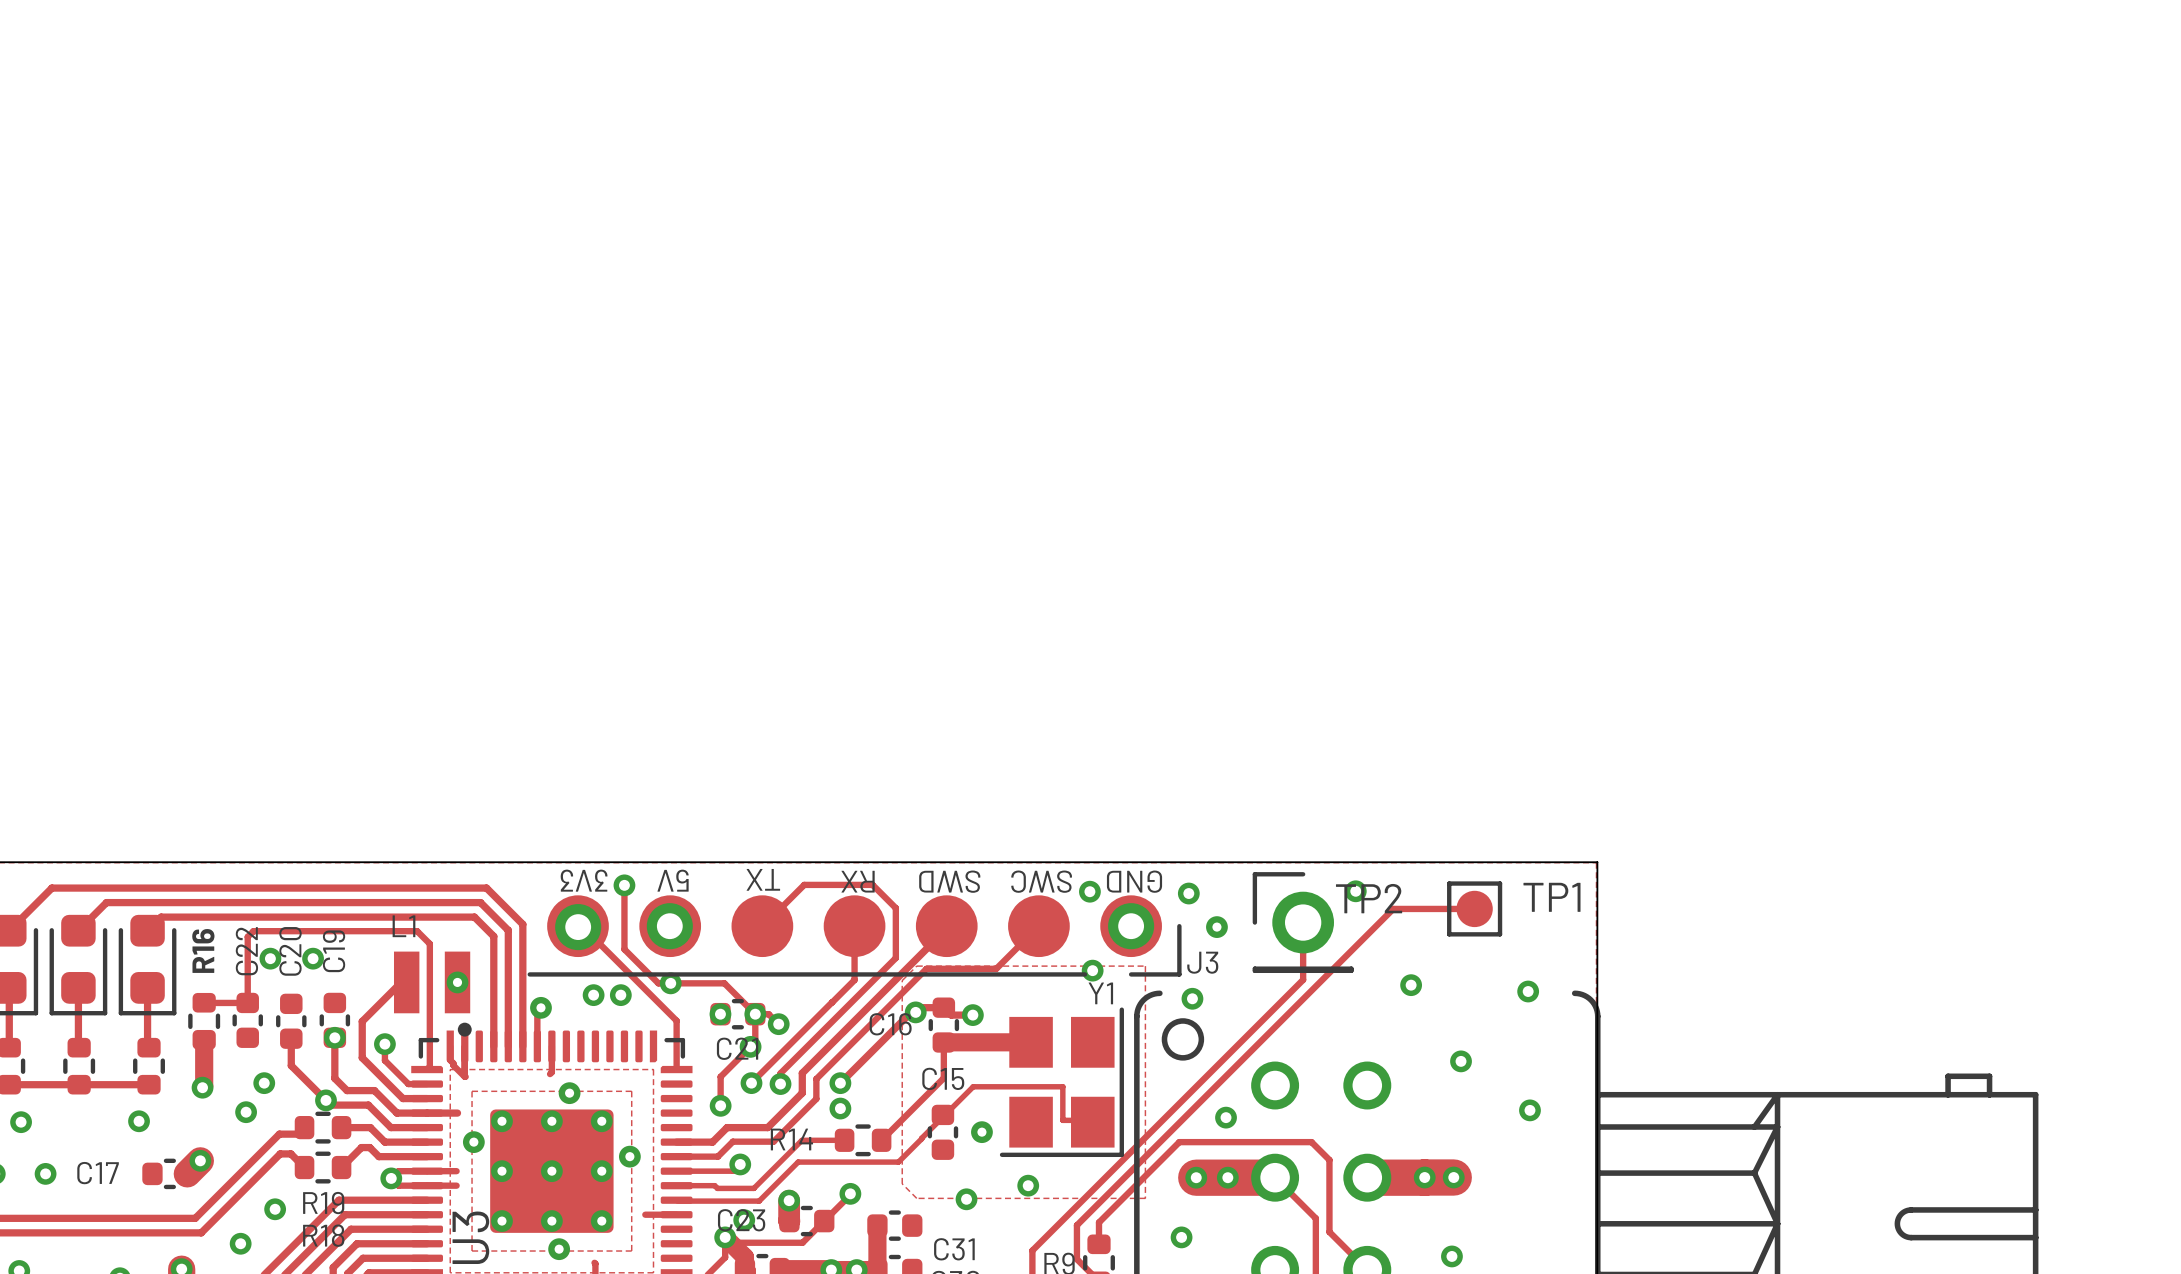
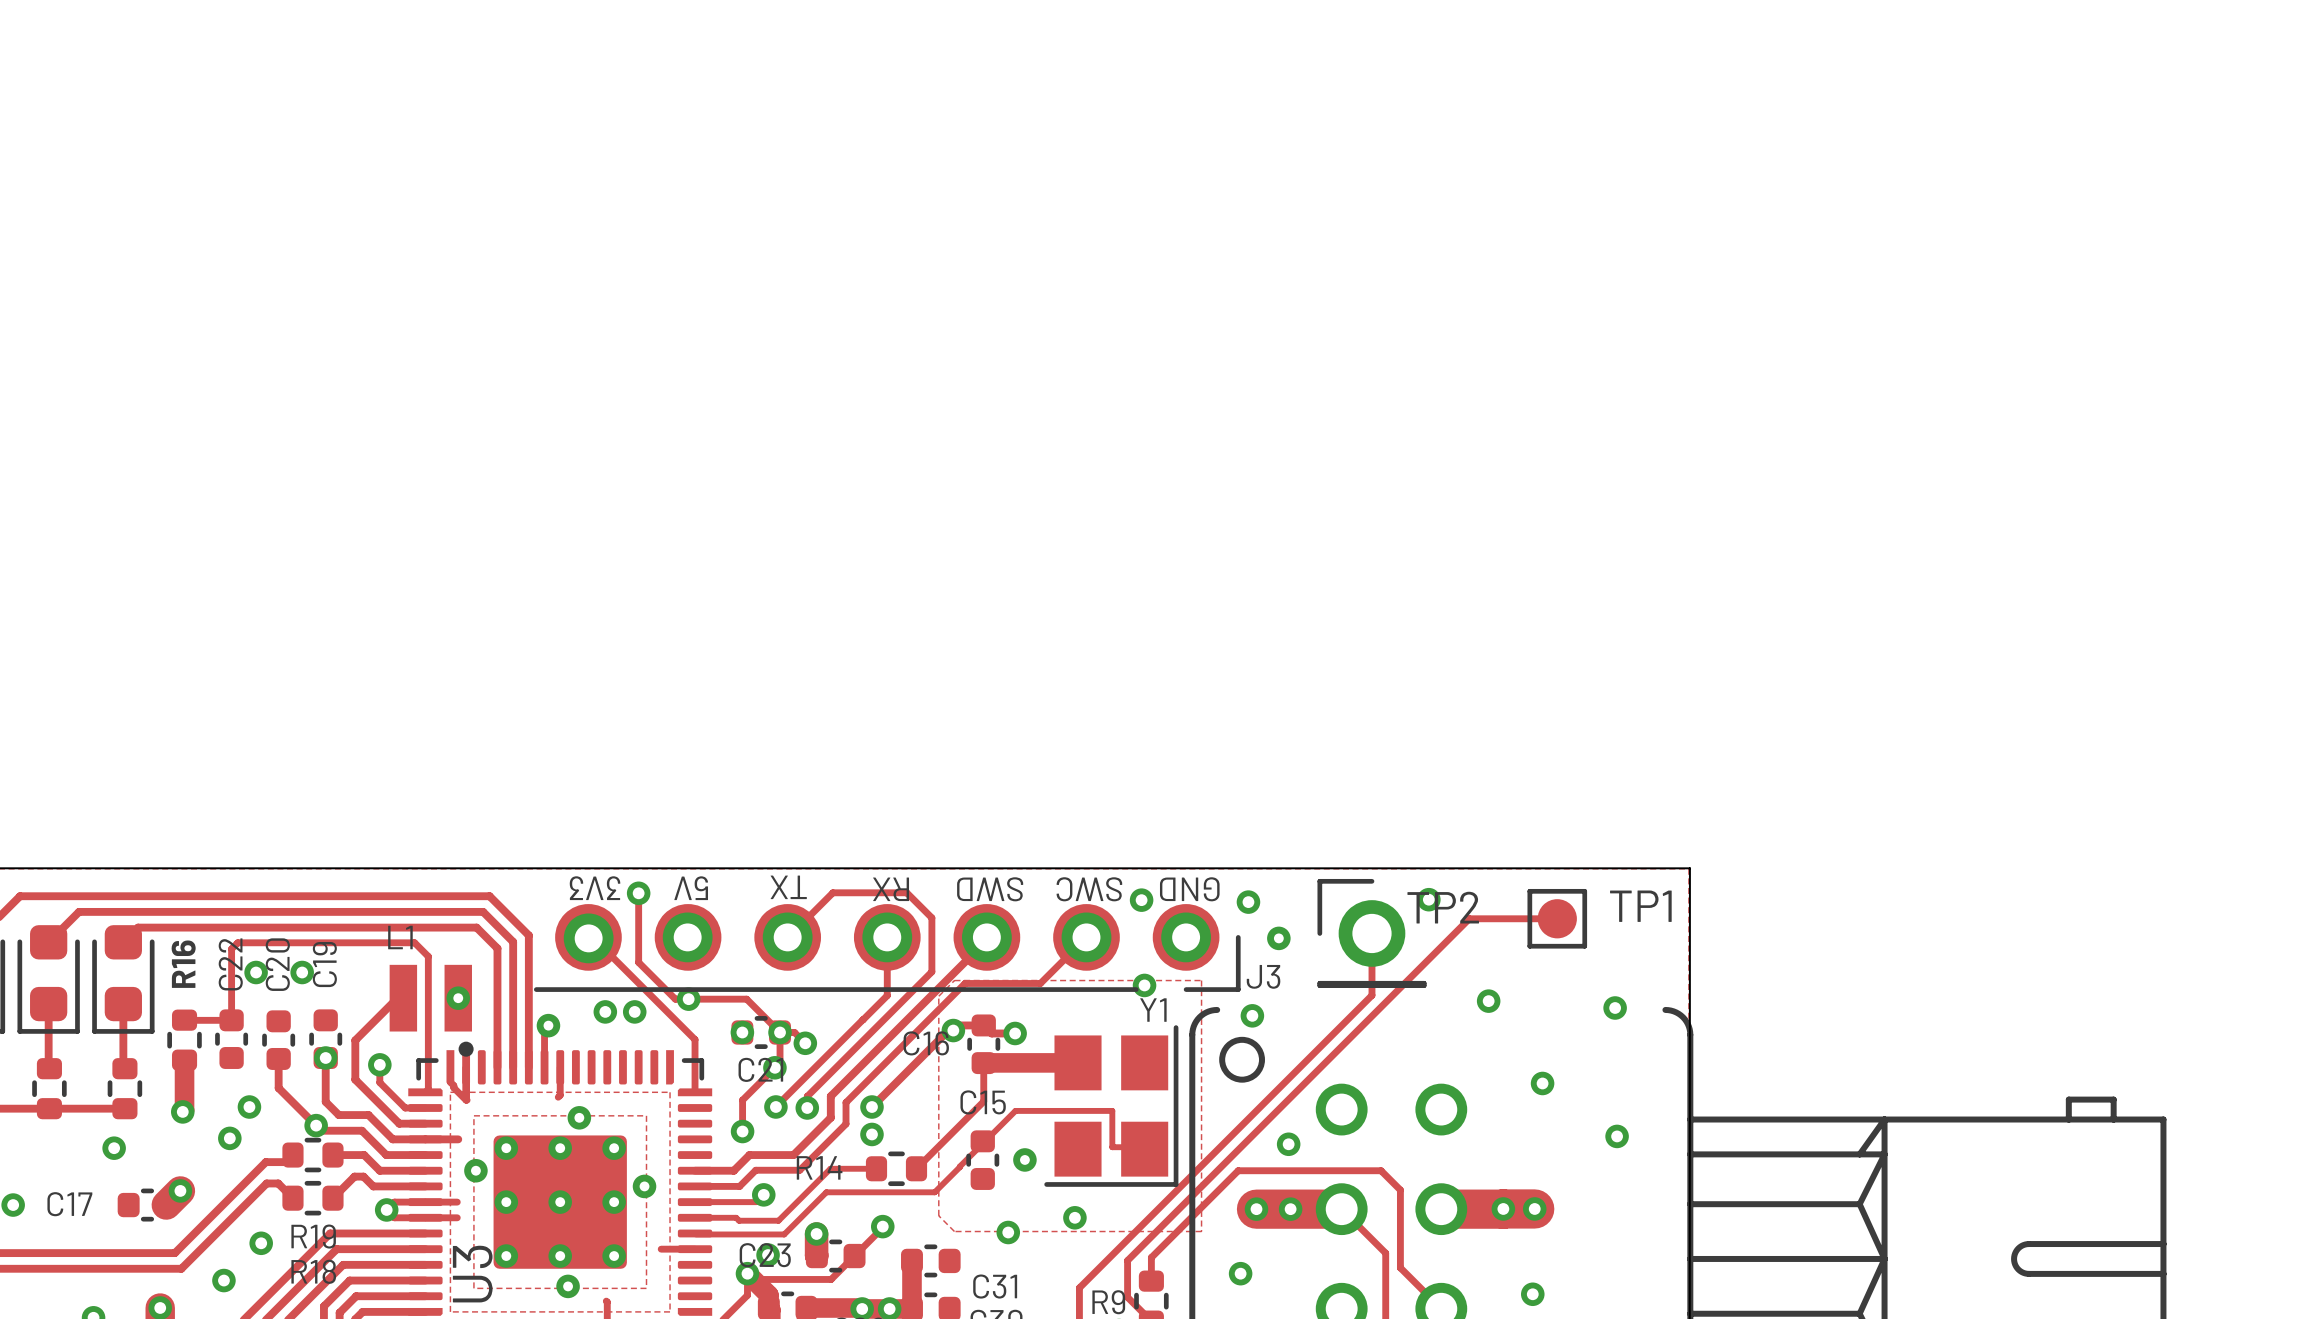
via: none -> (787, 937)
via: none -> (887, 937)
via: none -> (986, 937)
via: none -> (1086, 937)

